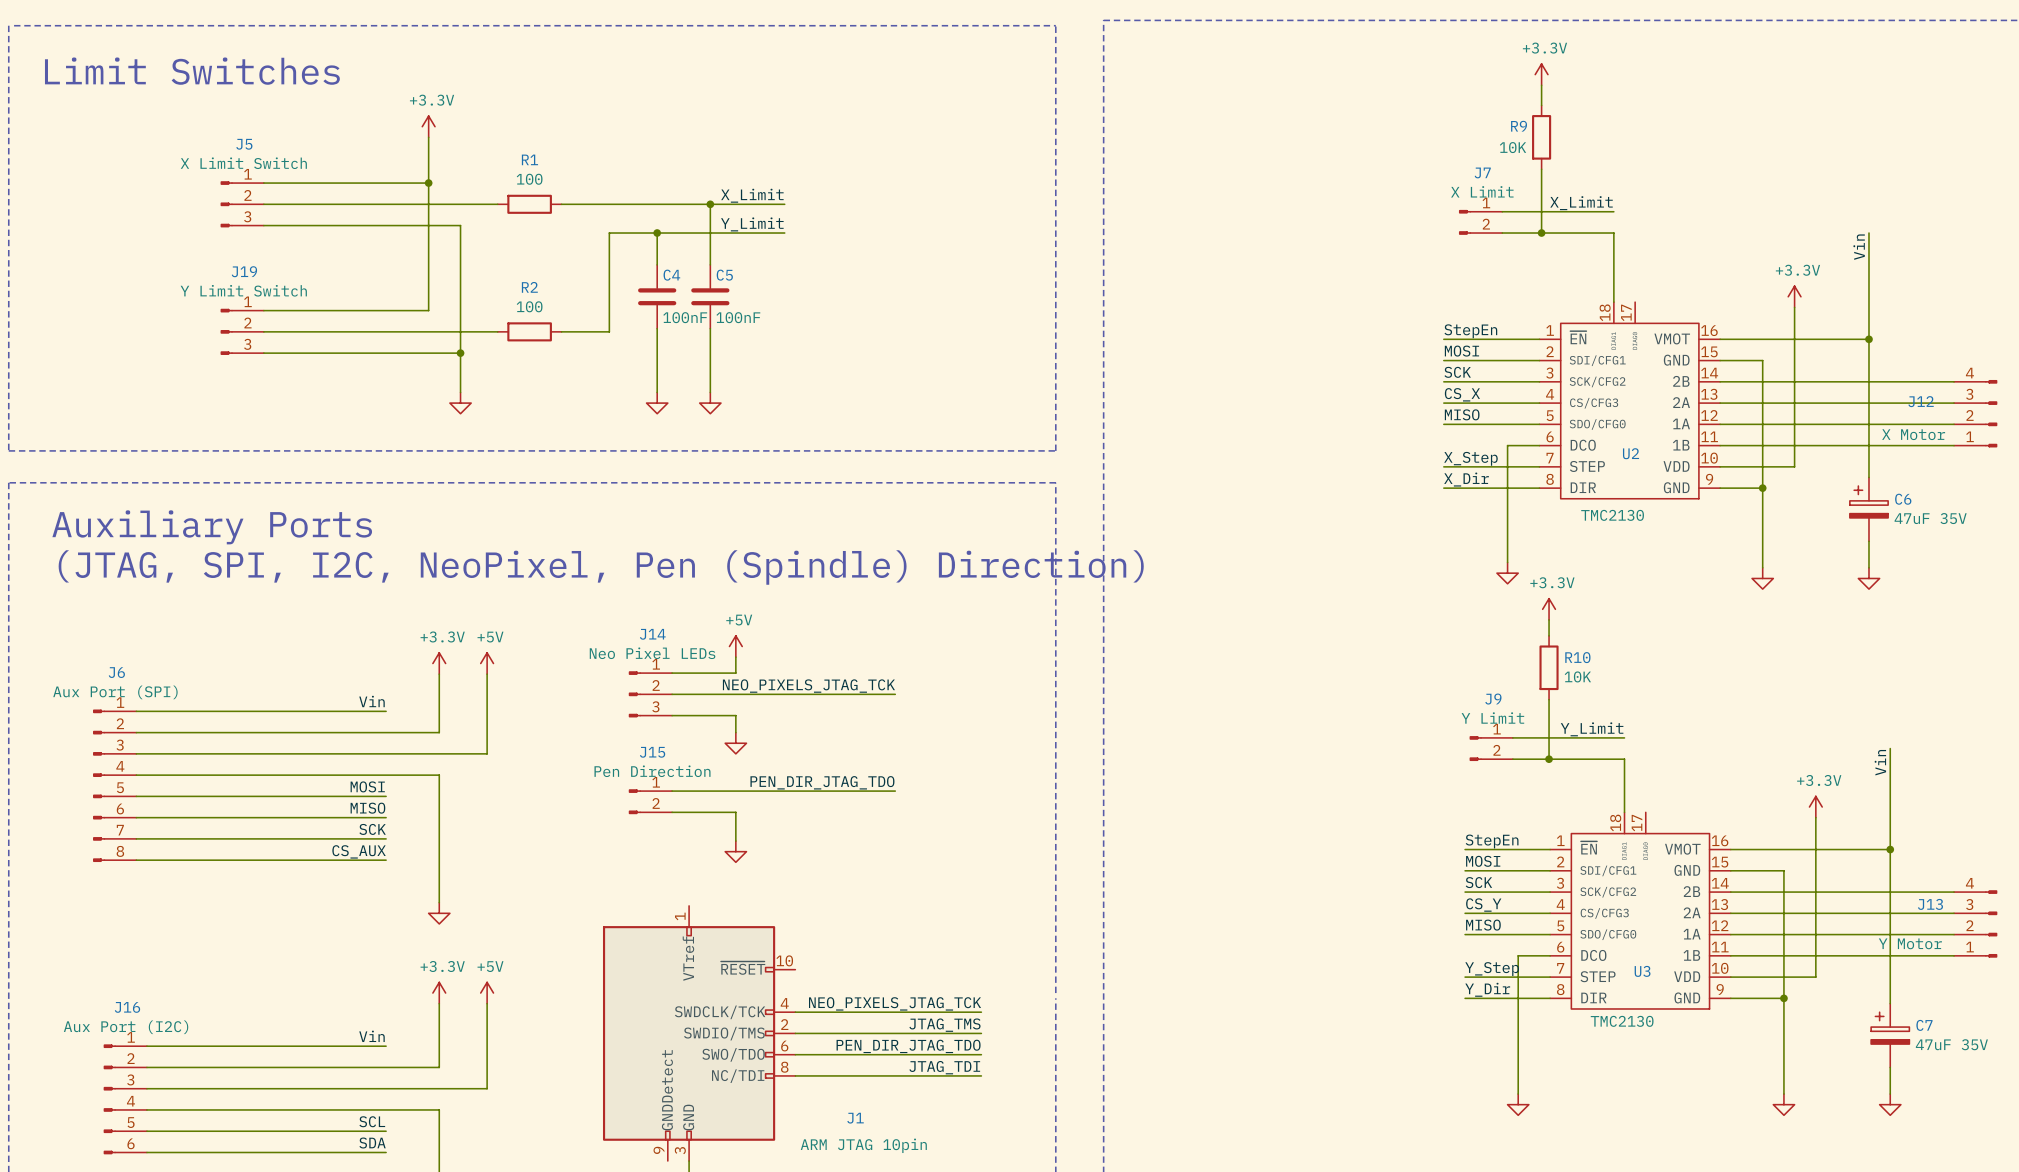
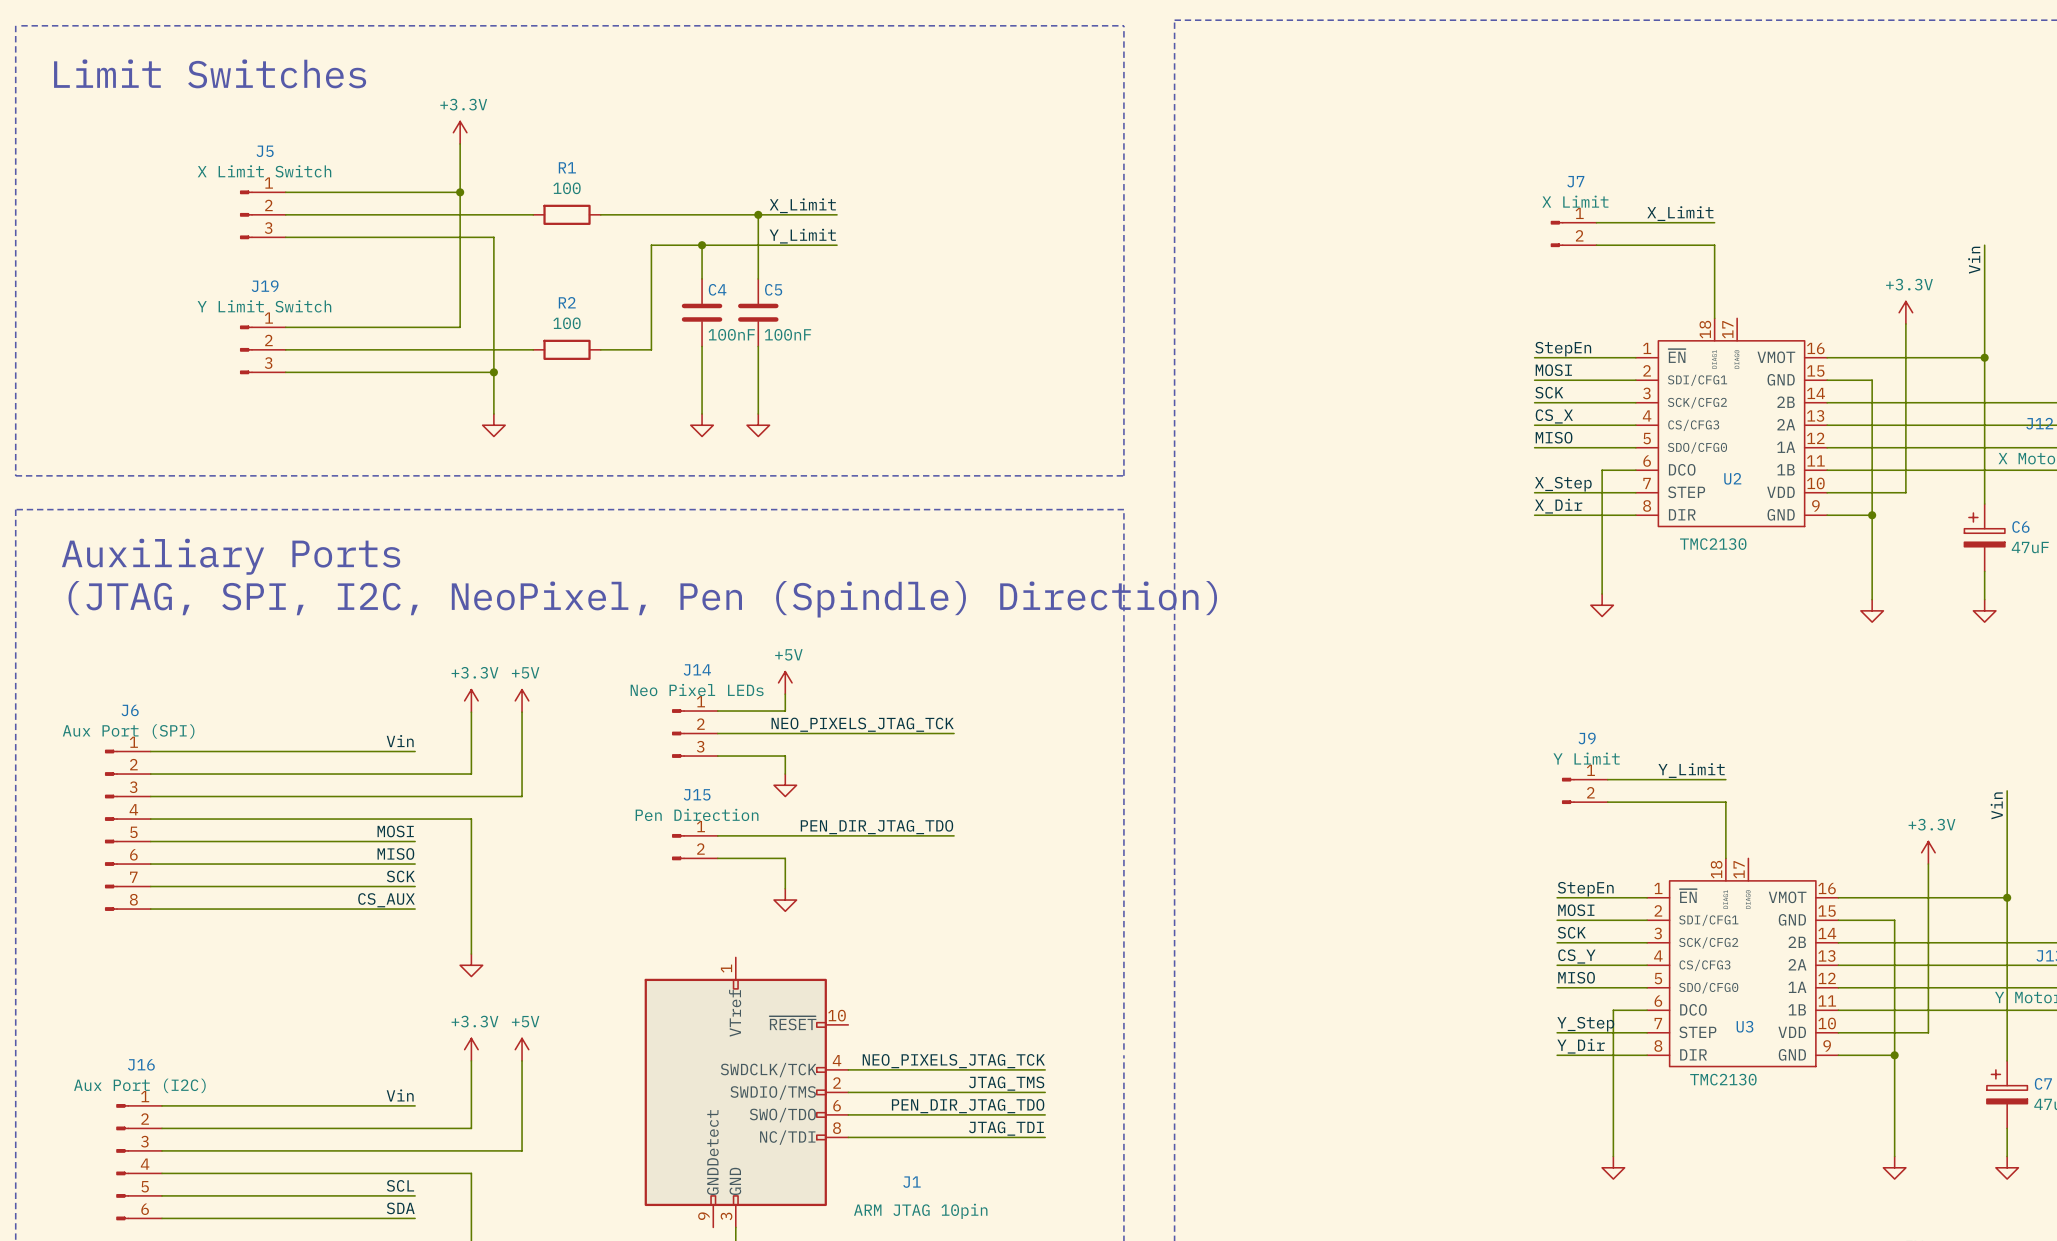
power symbol: +3.3V (1541, 74) -> none
wire: (1541, 85) (1541, 105) -> none
R9: 10K (1541, 137) -> none
wire: (1541, 169) (1541, 233) -> none
junction: (1541, 233) -> none
power symbol: +3.3V (1549, 609) -> none
wire: (1549, 619) (1549, 635) -> none
R10: 10K (1549, 667) -> none
wire: (1549, 699) (1549, 759) -> none
junction: (1549, 759) -> none

